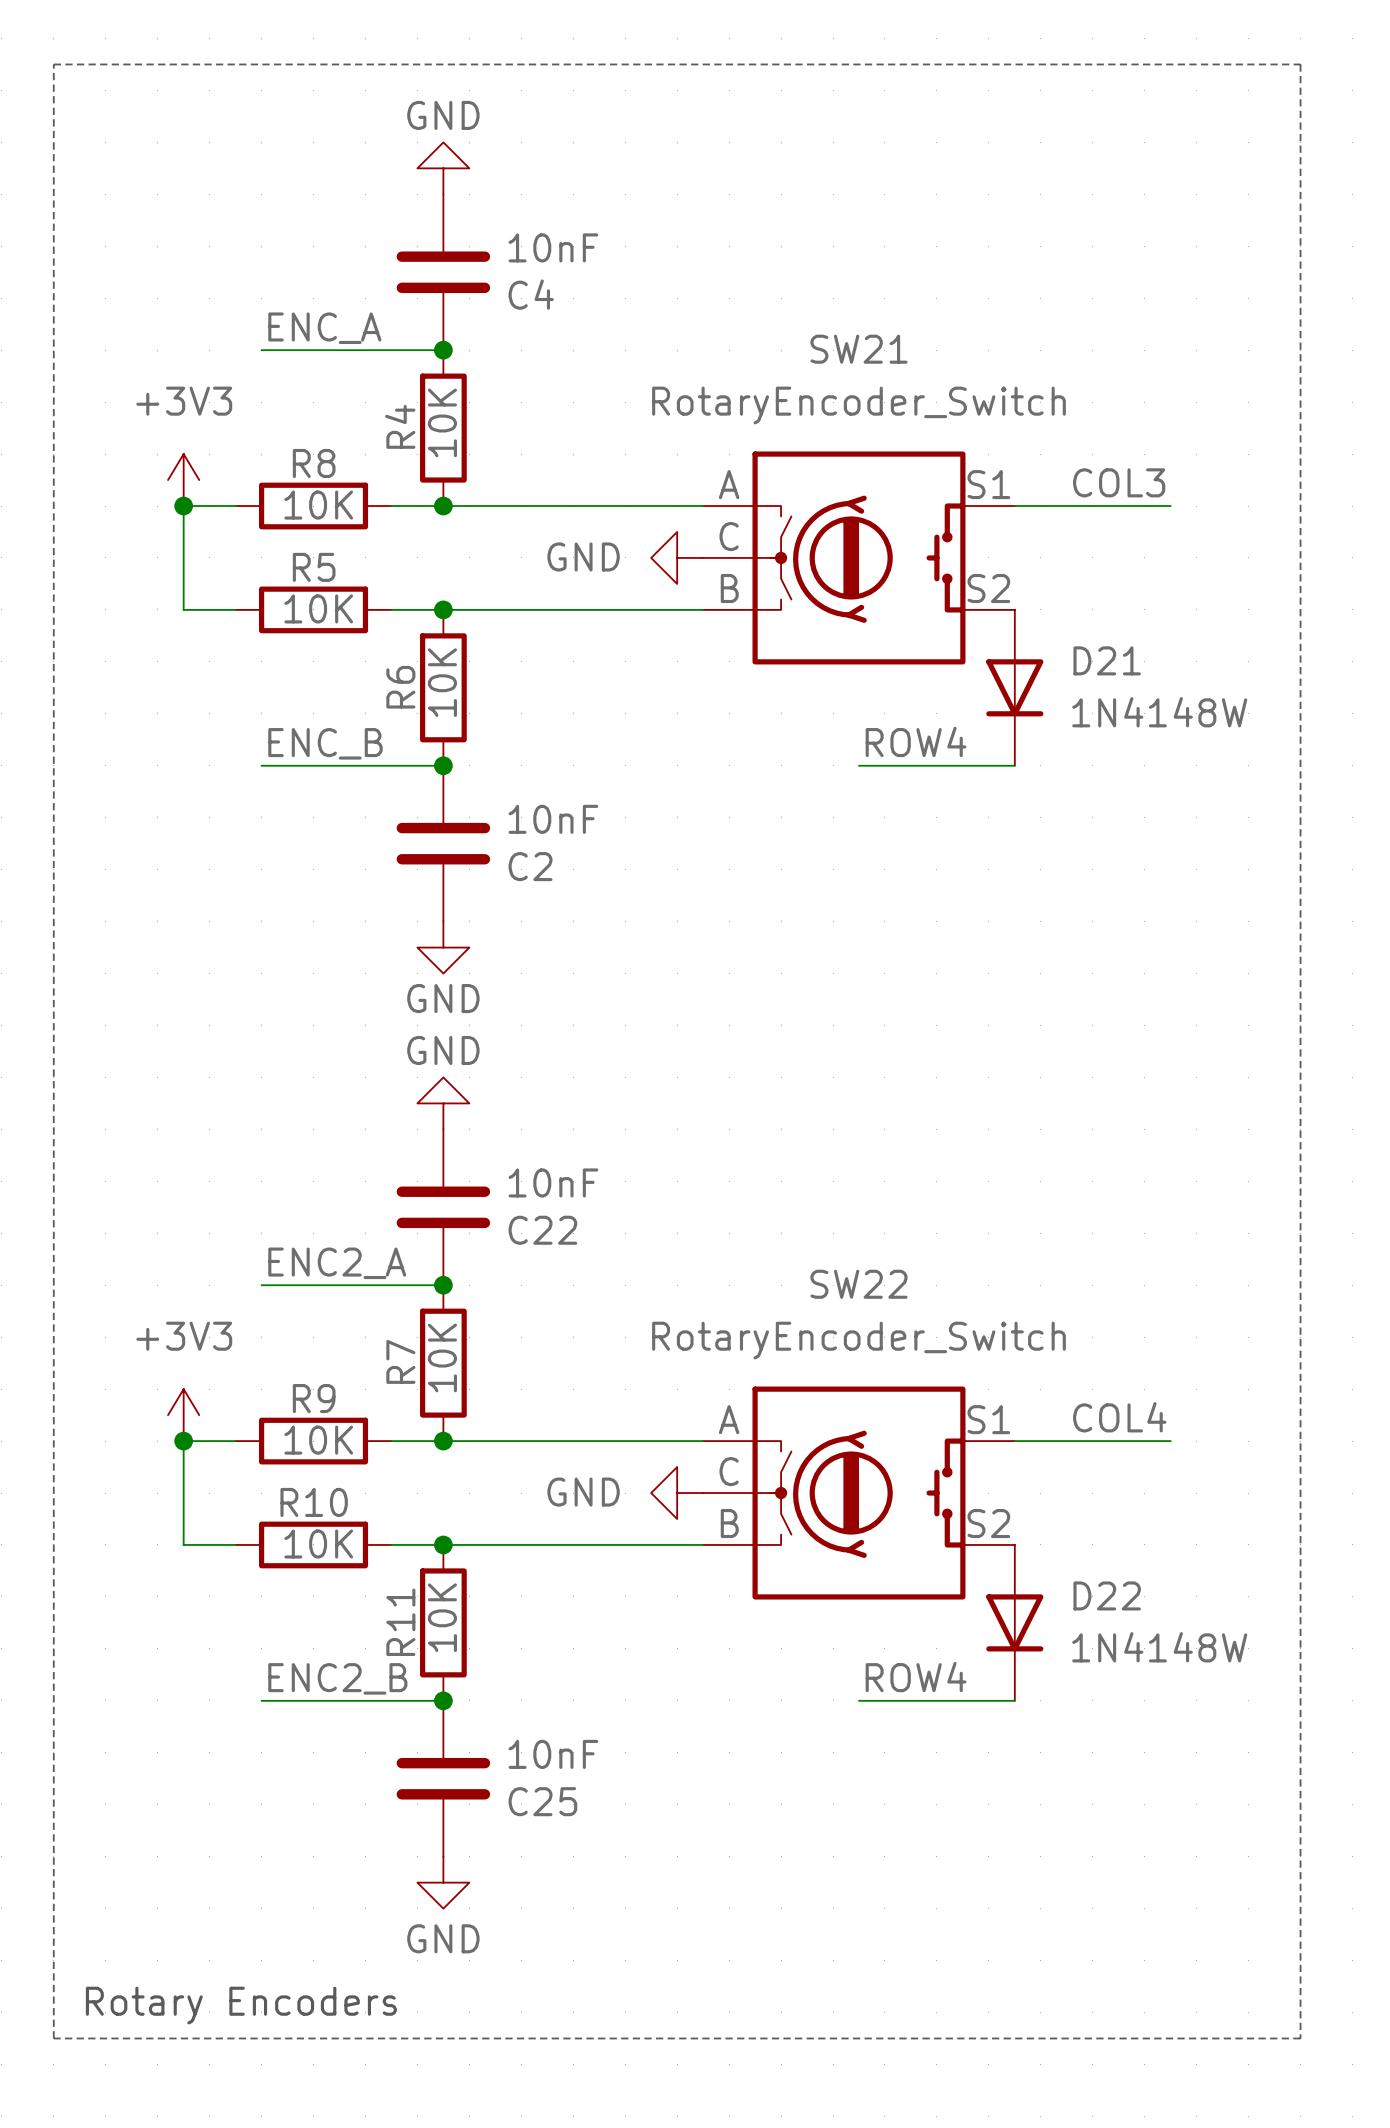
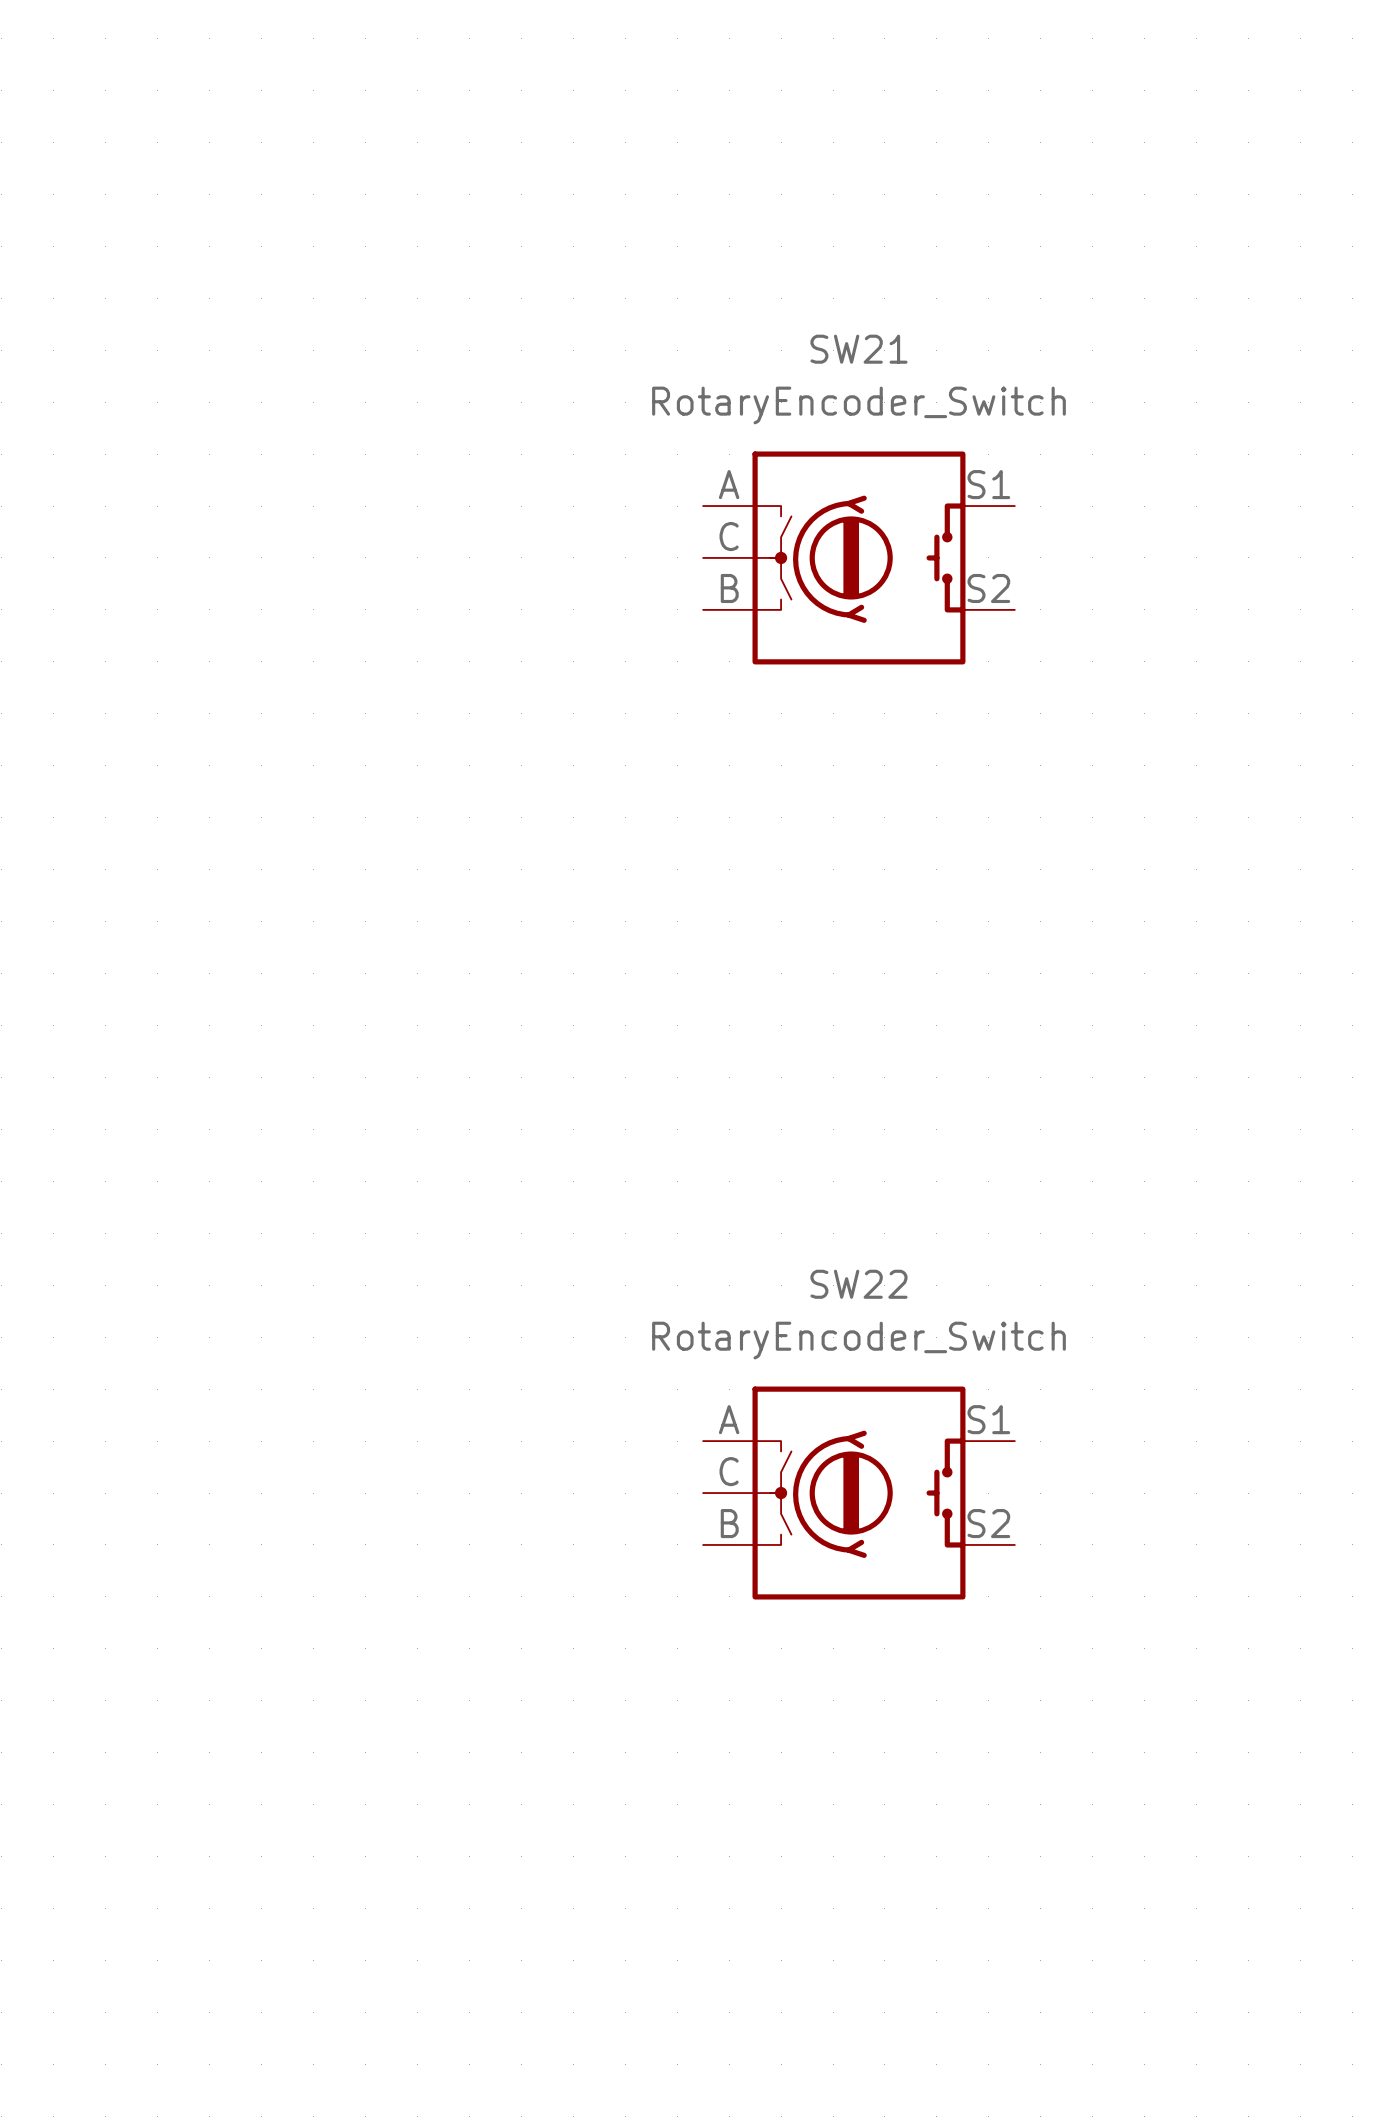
line: (53, 64) (1300, 64) (1300, 2038) (53, 2038) (53, 64) -> none
power symbol: GND (443, 168) -> none
C4: 10nF (443, 272) -> none
label: ENC_A (324, 328) -> none
wire: (261, 350) (443, 350) -> none
junction: (443, 350) -> none
R4: 10K (443, 428) -> none
power symbol: +3V3 (183, 480) -> none
label: COL3 (1119, 482) -> none
junction: (183, 506) -> none
wire: (235, 506) (183, 506) (183, 609) (235, 609) -> none
R8: 10K (313, 506) -> none
wire: (391, 506) (703, 506) -> none
junction: (443, 506) -> none
wire: (1014, 506) (1170, 506) -> none
power symbol: GND (677, 557) -> none
R5: 10K (313, 609) -> none
wire: (391, 609) (703, 609) -> none
junction: (443, 609) -> none
R6: 10K (443, 687) -> none
D21: 1N4148W (1014, 687) -> none
label: ROW4 (916, 741) -> none
label: ENC_B (325, 743) -> none
wire: (261, 765) (443, 765) -> none
junction: (443, 765) -> none
wire: (858, 765) (1014, 765) -> none
C2: 10nF (443, 843) -> none
power symbol: GND (443, 947) -> none
power symbol: GND (443, 1103) -> none
C22: 10nF (443, 1207) -> none
label: ENC2_A (337, 1263) -> none
wire: (261, 1285) (443, 1285) -> none
junction: (443, 1285) -> none
R7: 10K (443, 1363) -> none
power symbol: +3V3 (183, 1415) -> none
label: COL4 (1119, 1417) -> none
junction: (183, 1441) -> none
wire: (235, 1441) (183, 1441) (183, 1544) (235, 1544) -> none
R9: 10K (313, 1441) -> none
wire: (391, 1441) (703, 1441) -> none
junction: (443, 1441) -> none
wire: (1014, 1441) (1170, 1441) -> none
power symbol: GND (677, 1493) -> none
R10: 10K (313, 1544) -> none
wire: (391, 1544) (703, 1544) -> none
junction: (443, 1544) -> none
R11: 10K (443, 1622) -> none
D22: 1N4148W (1014, 1622) -> none
label: ROW4 (916, 1677) -> none
label: ENC2_B (337, 1678) -> none
wire: (261, 1700) (443, 1700) -> none
junction: (443, 1700) -> none
wire: (858, 1700) (1014, 1700) -> none
C25: 10nF (443, 1778) -> none
power symbol: GND (443, 1882) -> none
text: Rotary Encoders (241, 2005) -> none

